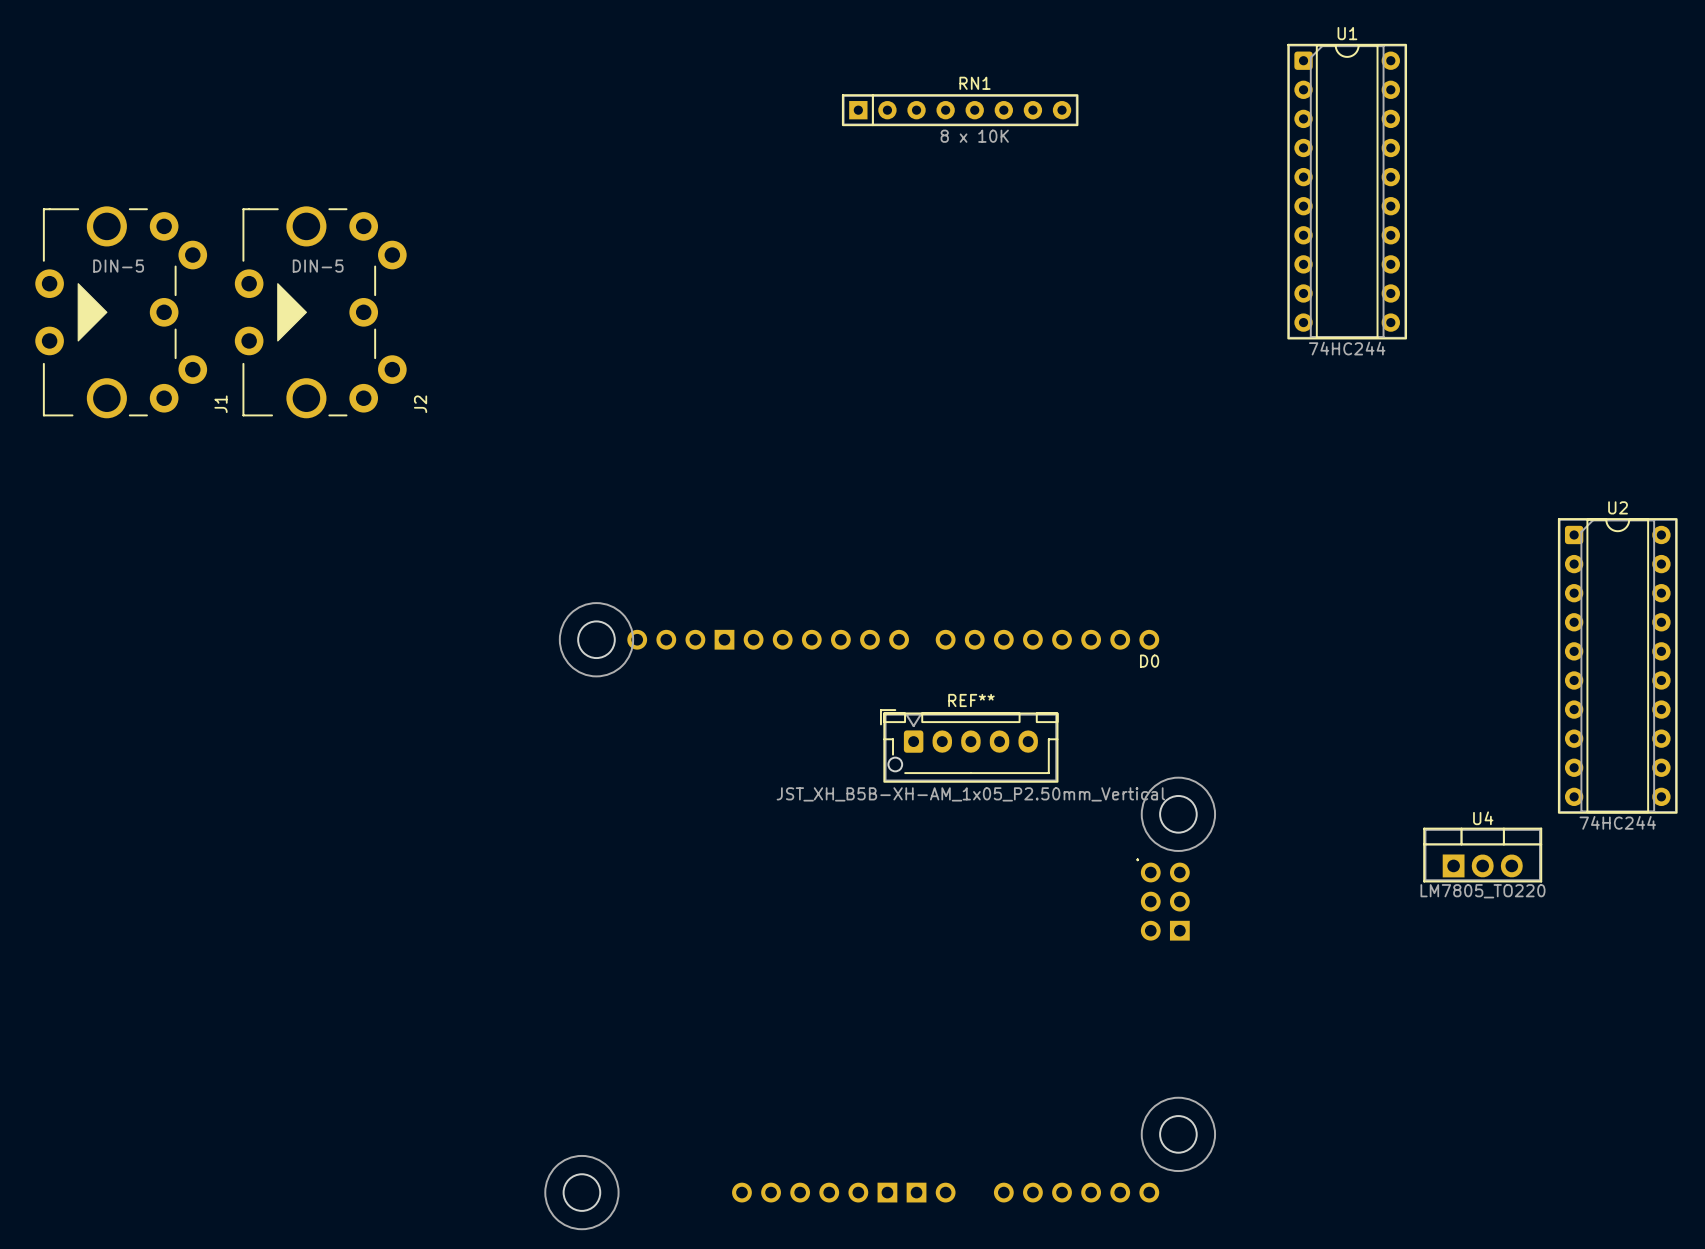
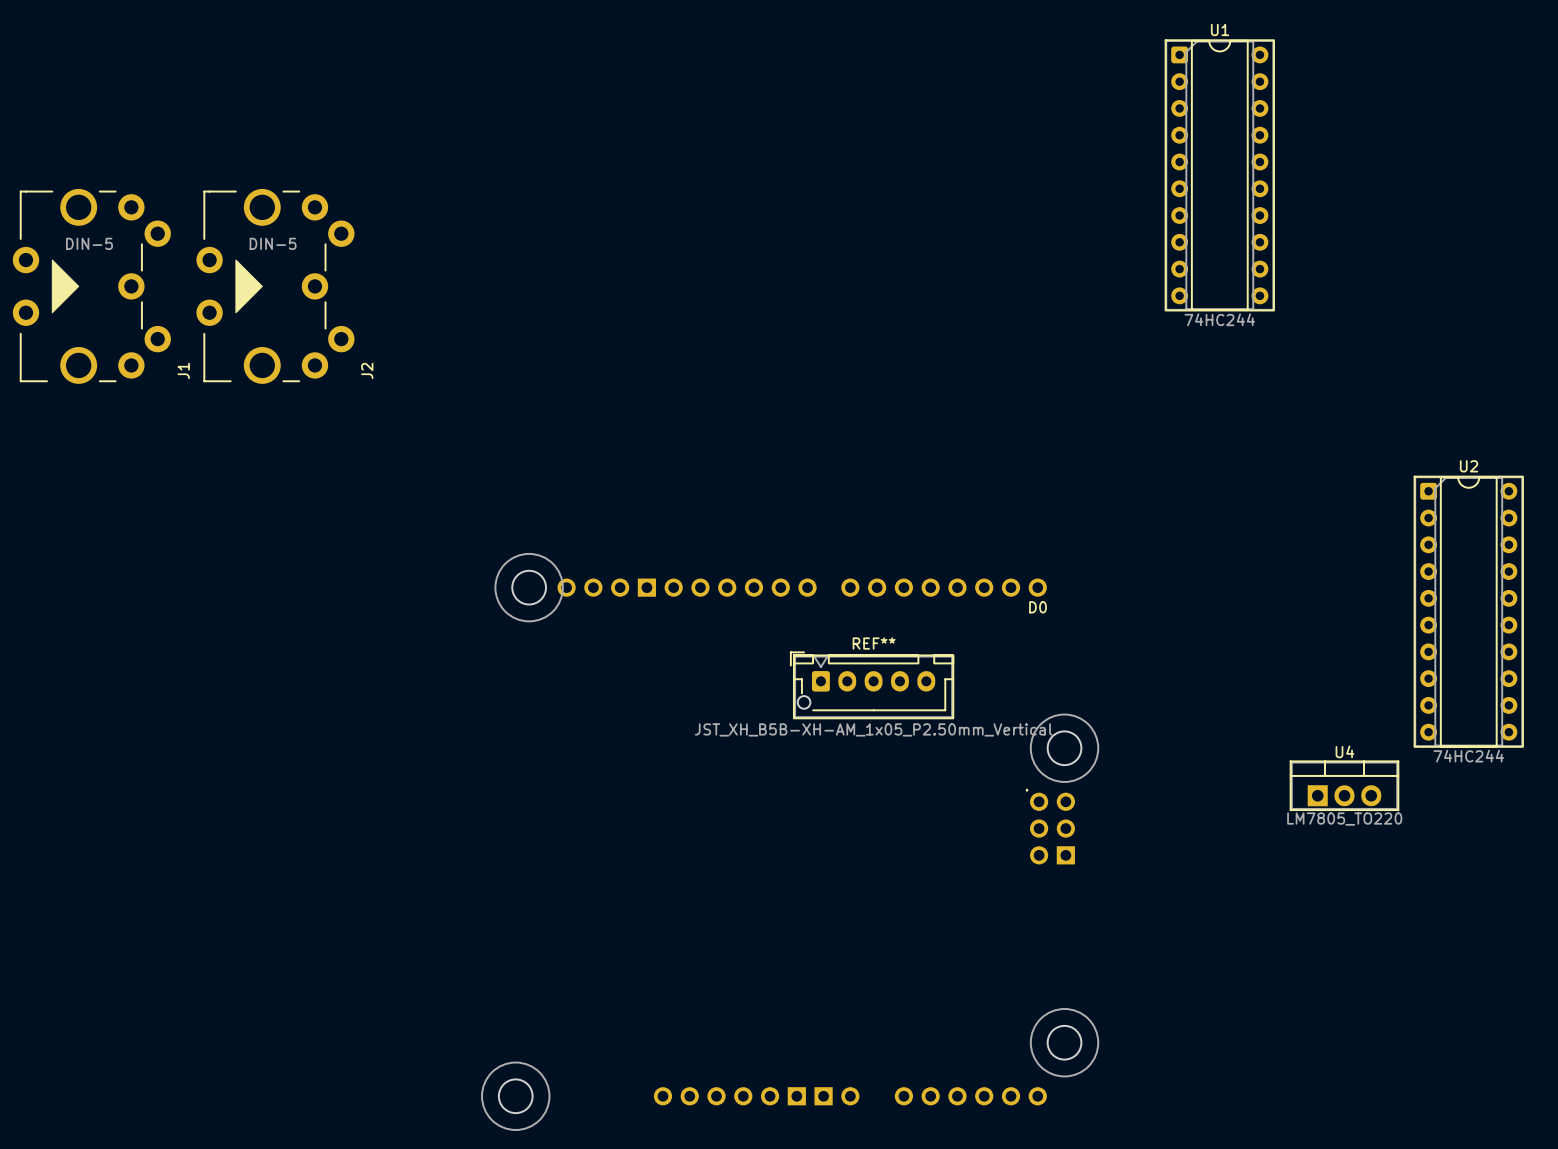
RN1: 8 x 10K (960, 110) -> none

